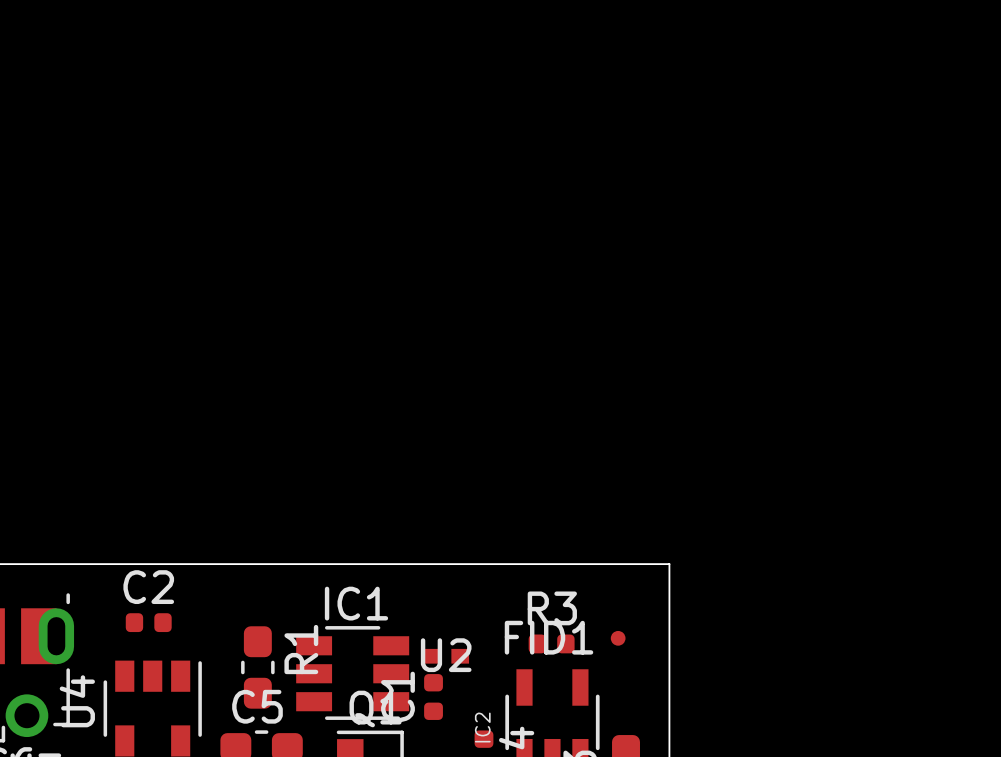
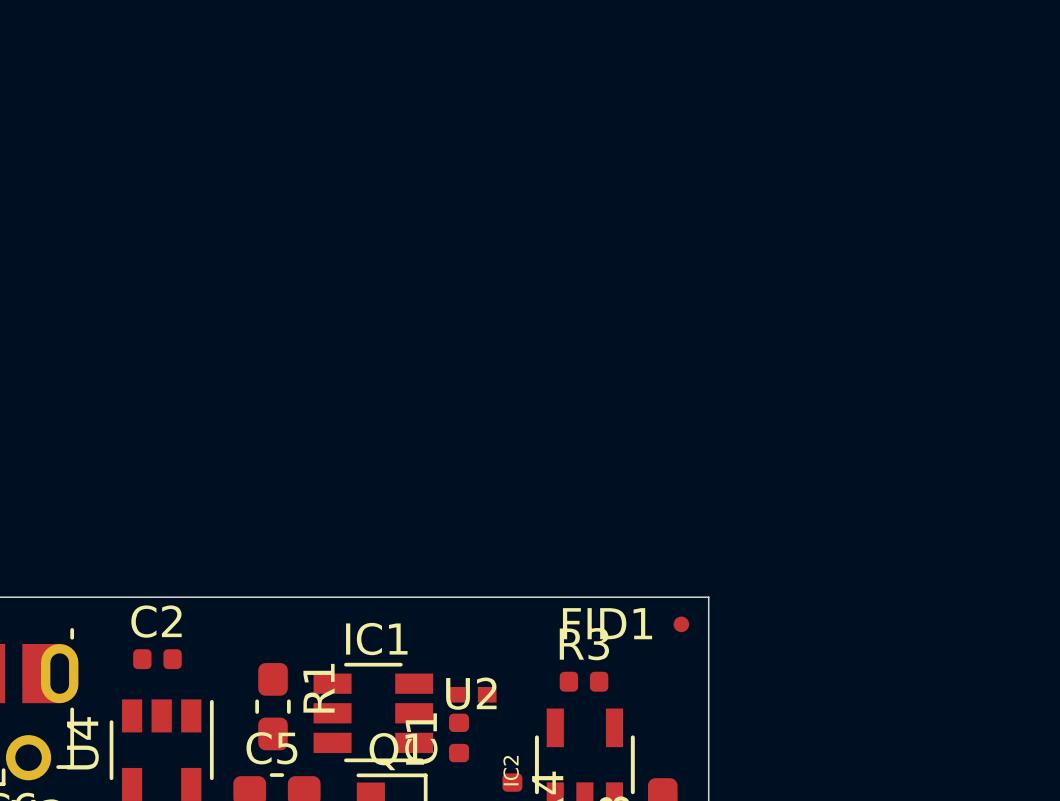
FID1 position: (618, 638) -> (681, 624)

